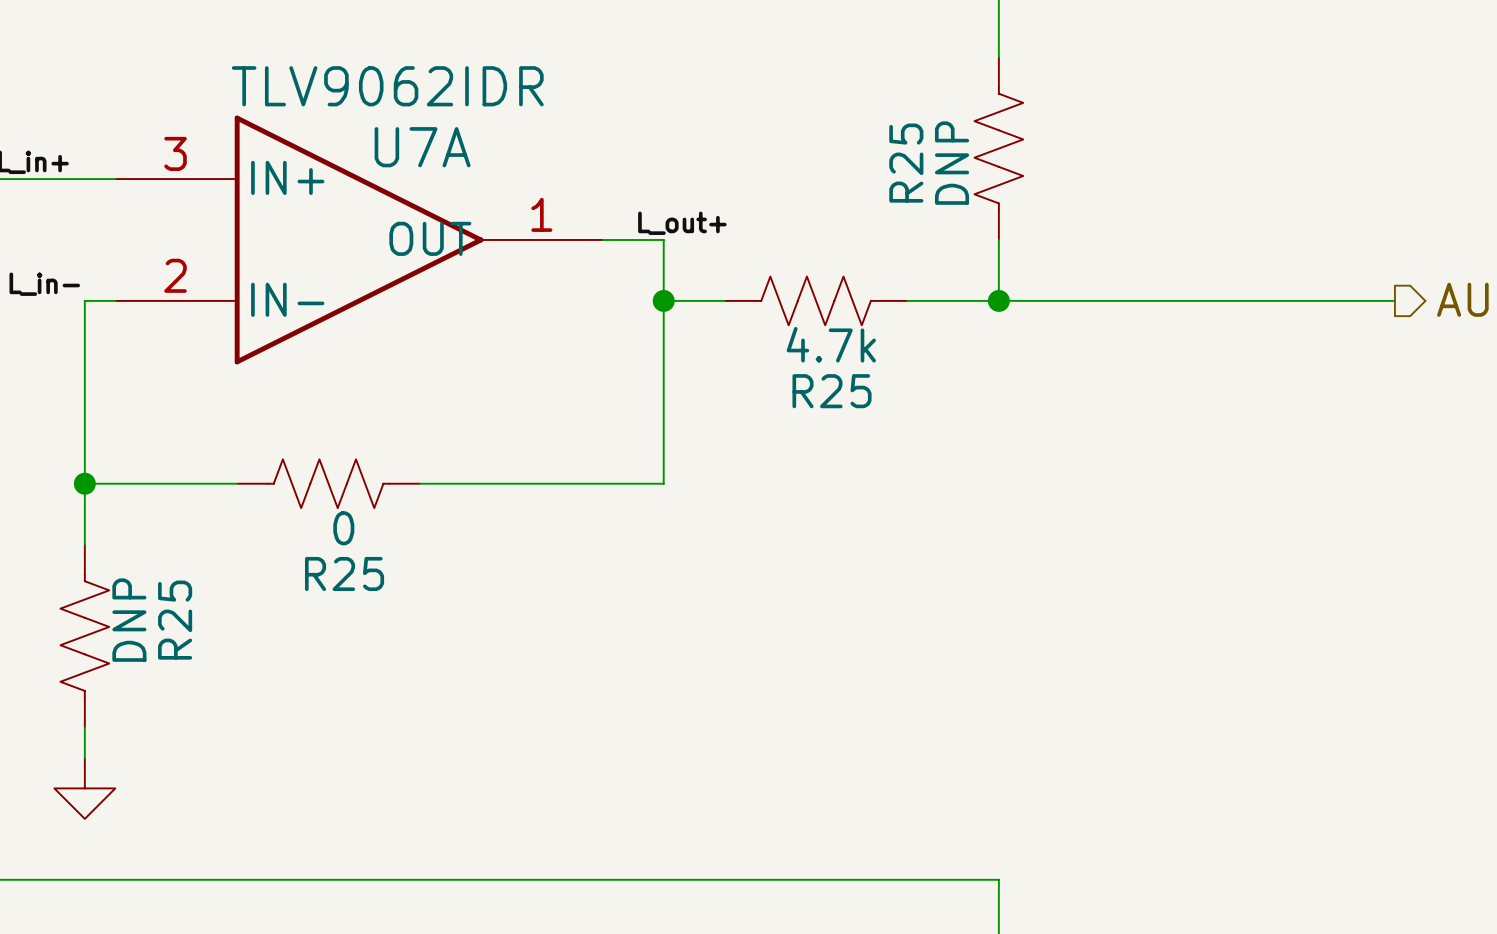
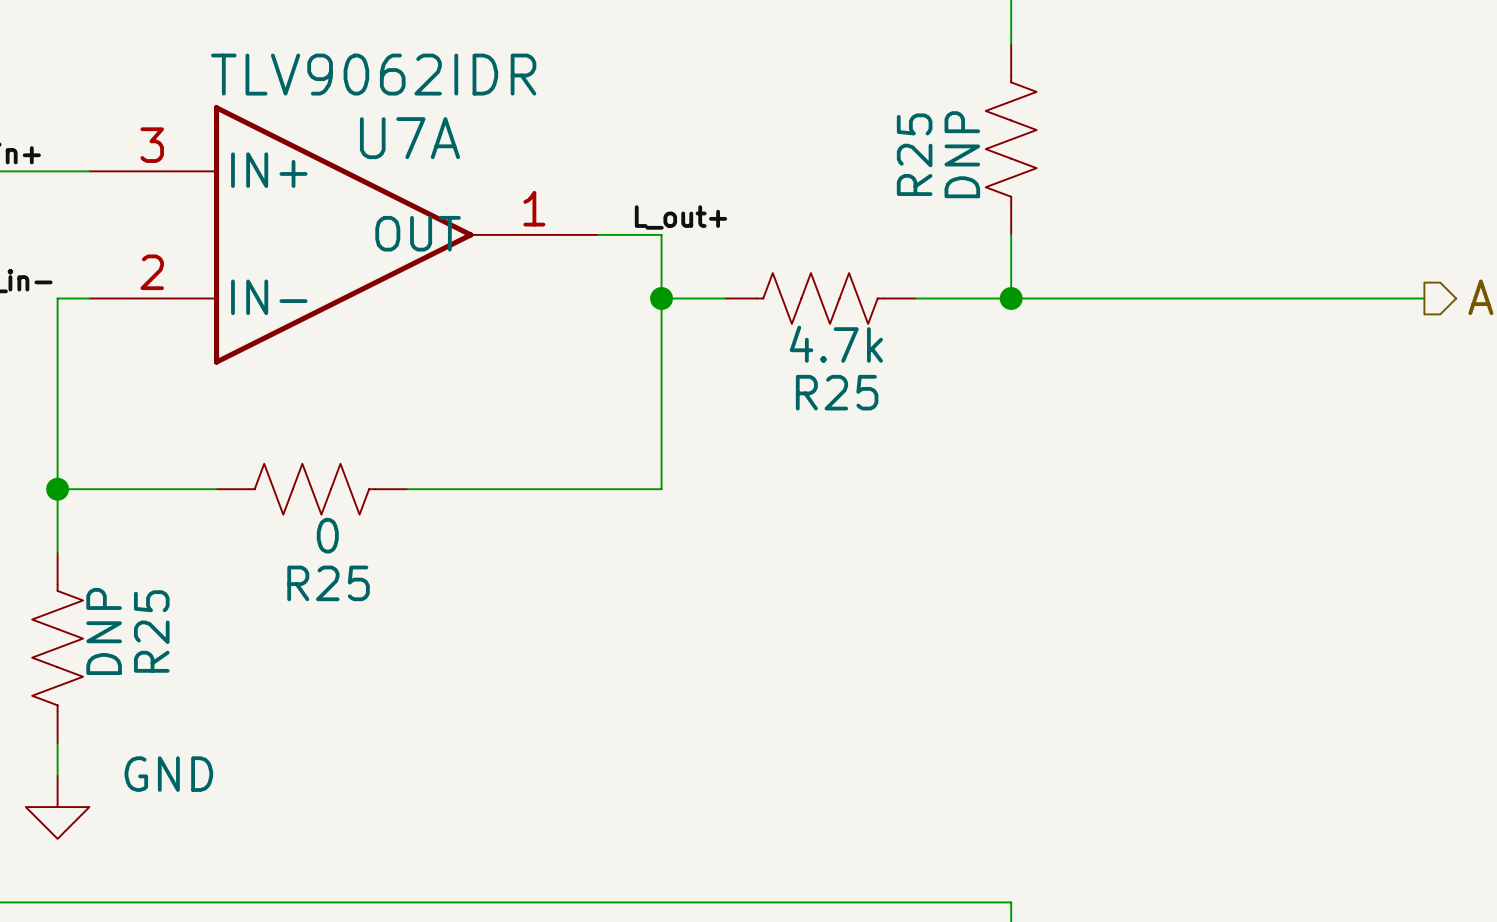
power symbol text: none -> GND (168, 774)

